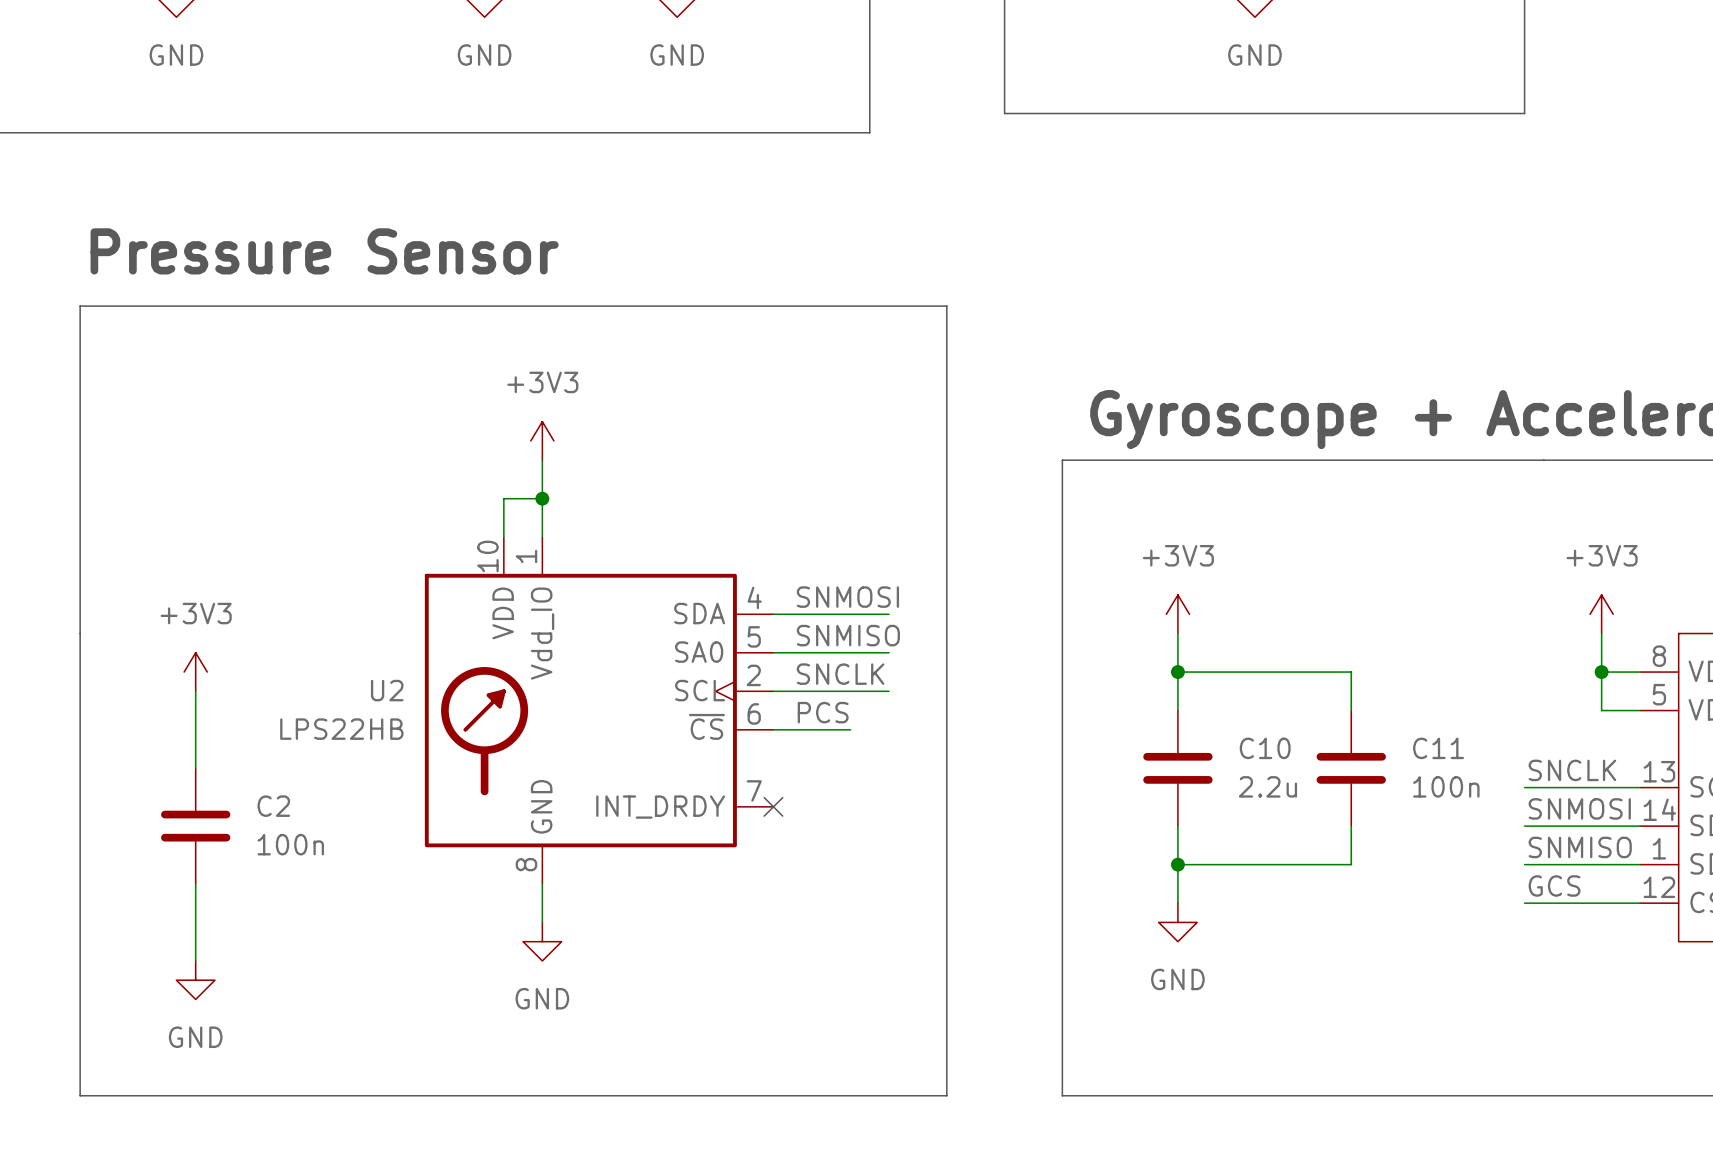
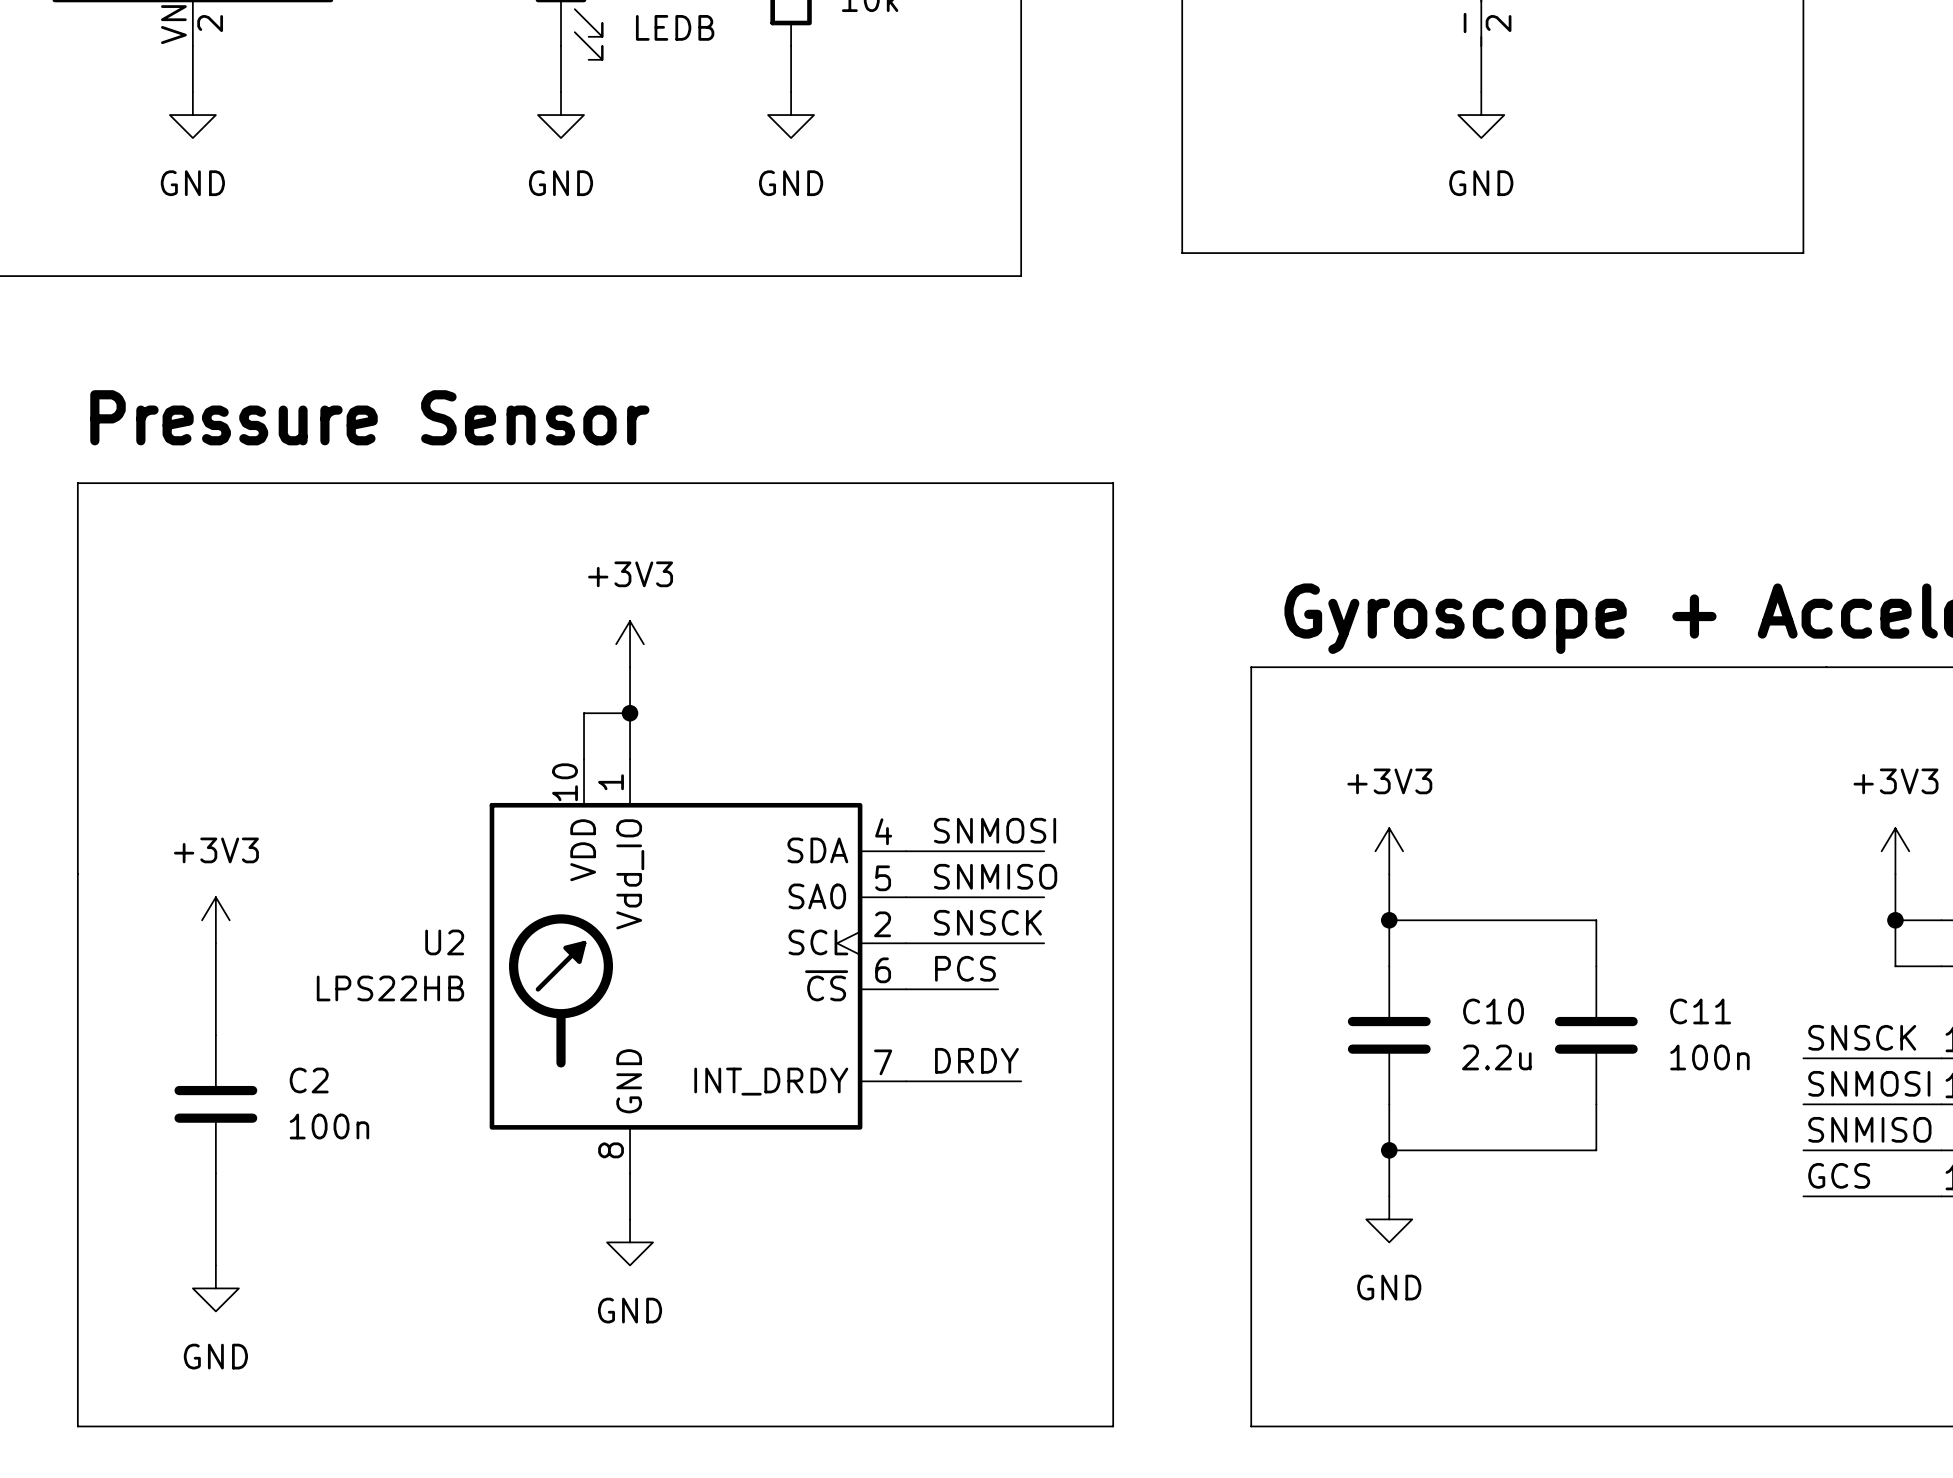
label: SNCLK (840, 674) -> SNSCK (987, 922)
label: SNCLK (1572, 770) -> SNSCK (1862, 1037)
label: none -> DRDY (976, 1060)
wire: none -> (906, 1081) (1021, 1081)
no-connect mark: (773, 806) -> none

